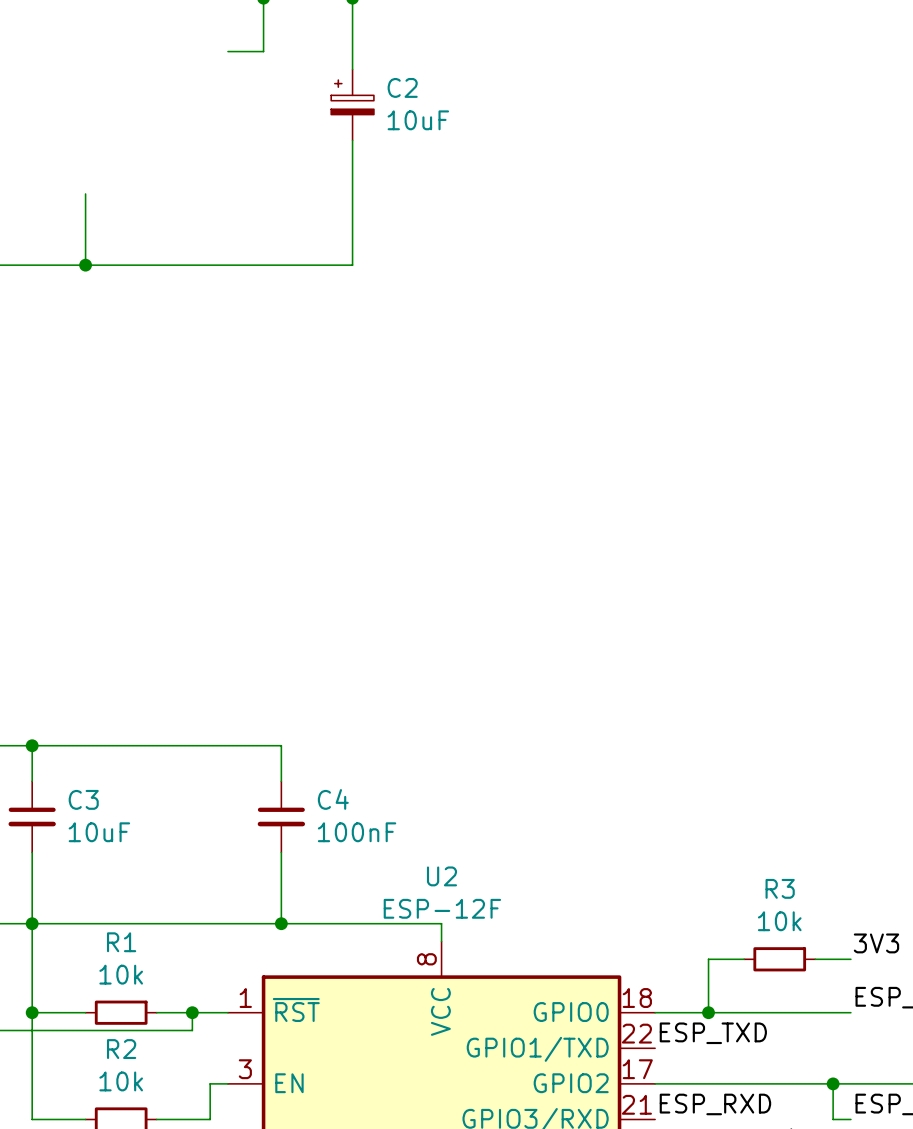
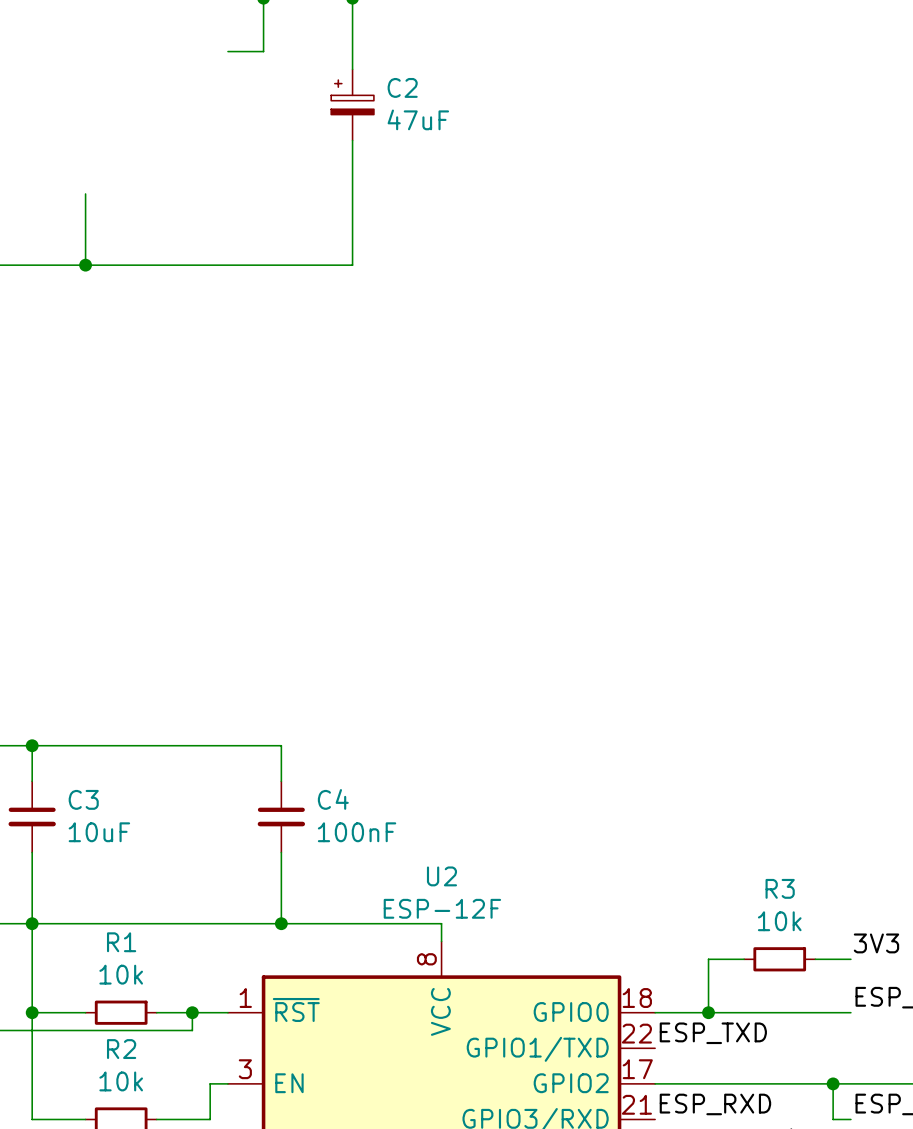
C2 value: 10uF (418, 120) -> 47uF (418, 119)

